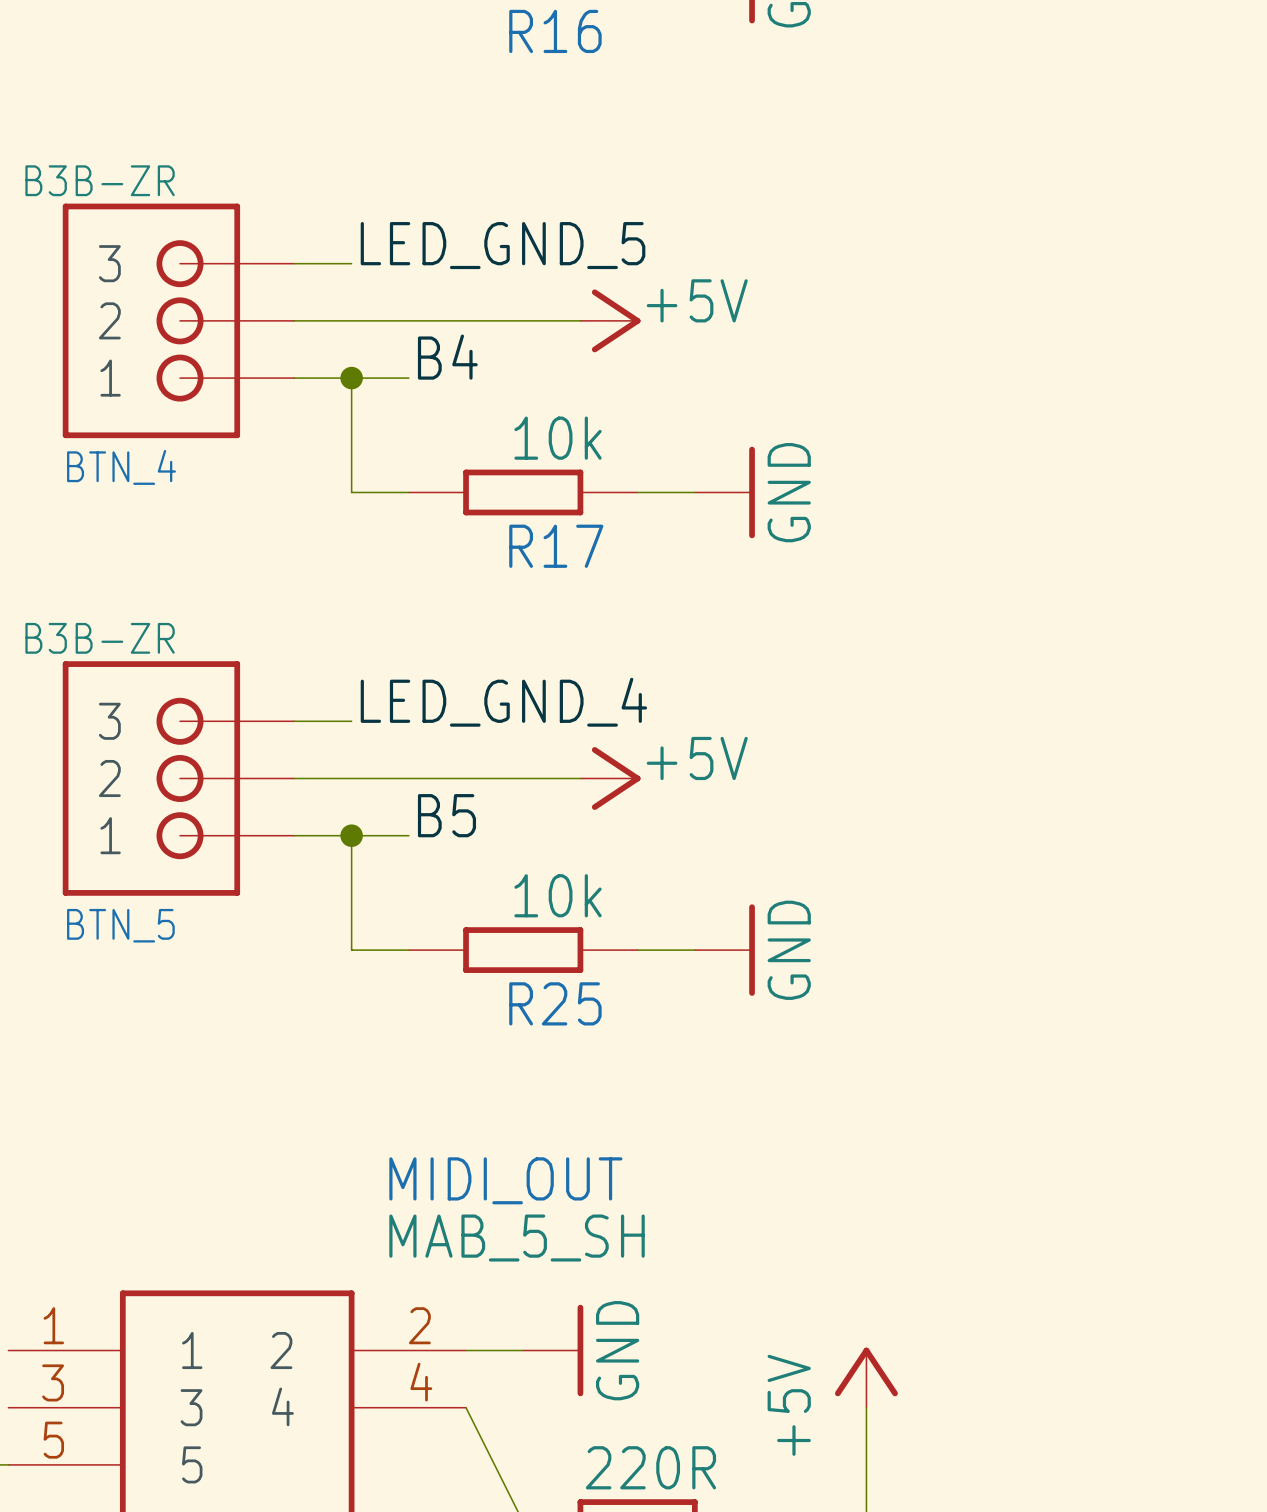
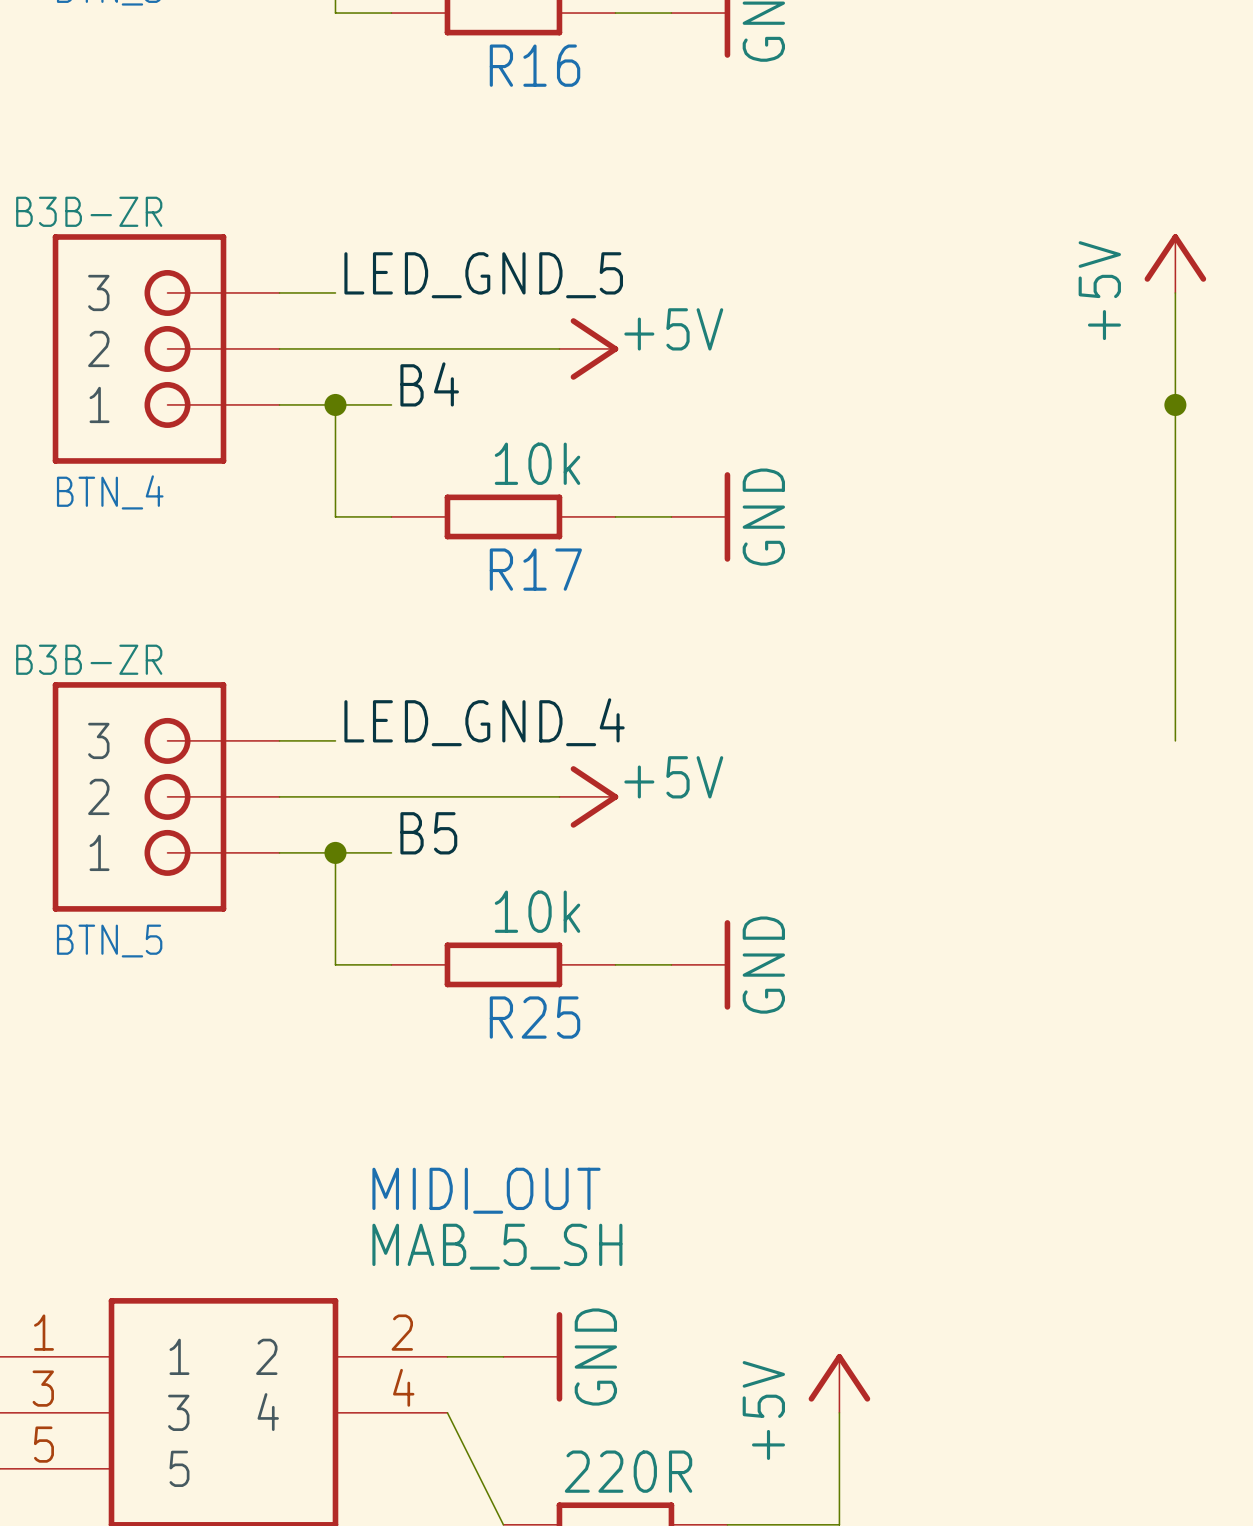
power symbol: none -> +5V (1175, 263)
wire: none -> (1175, 292) (1175, 740)
junction: none -> (1175, 404)

